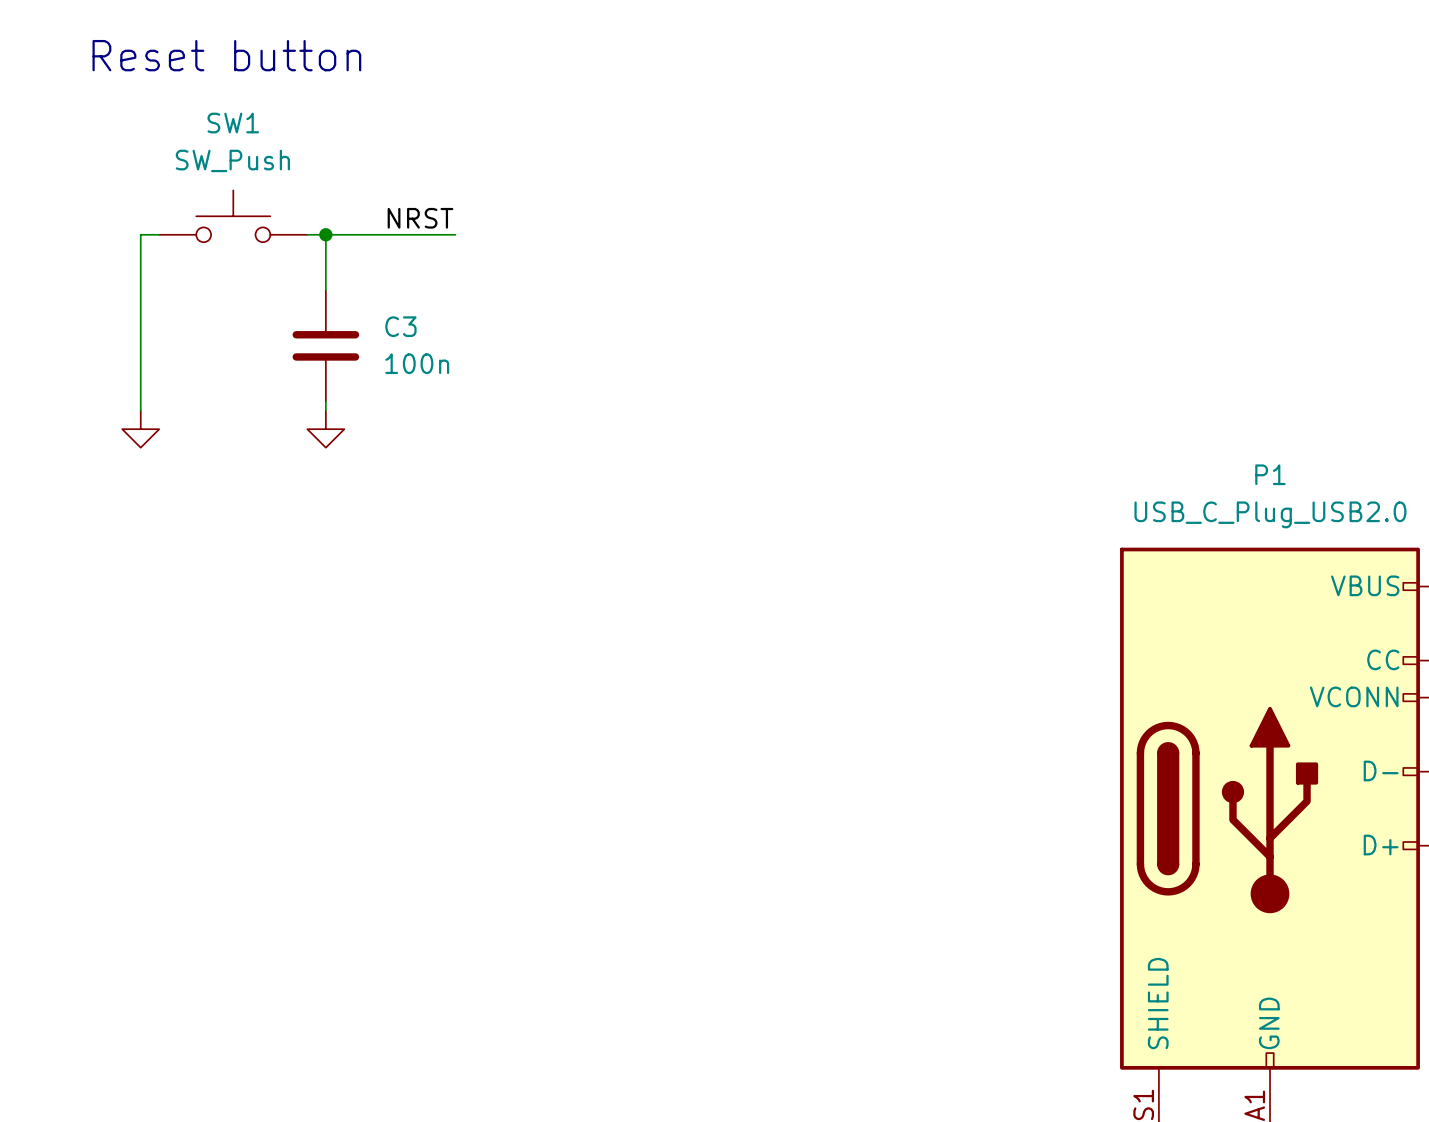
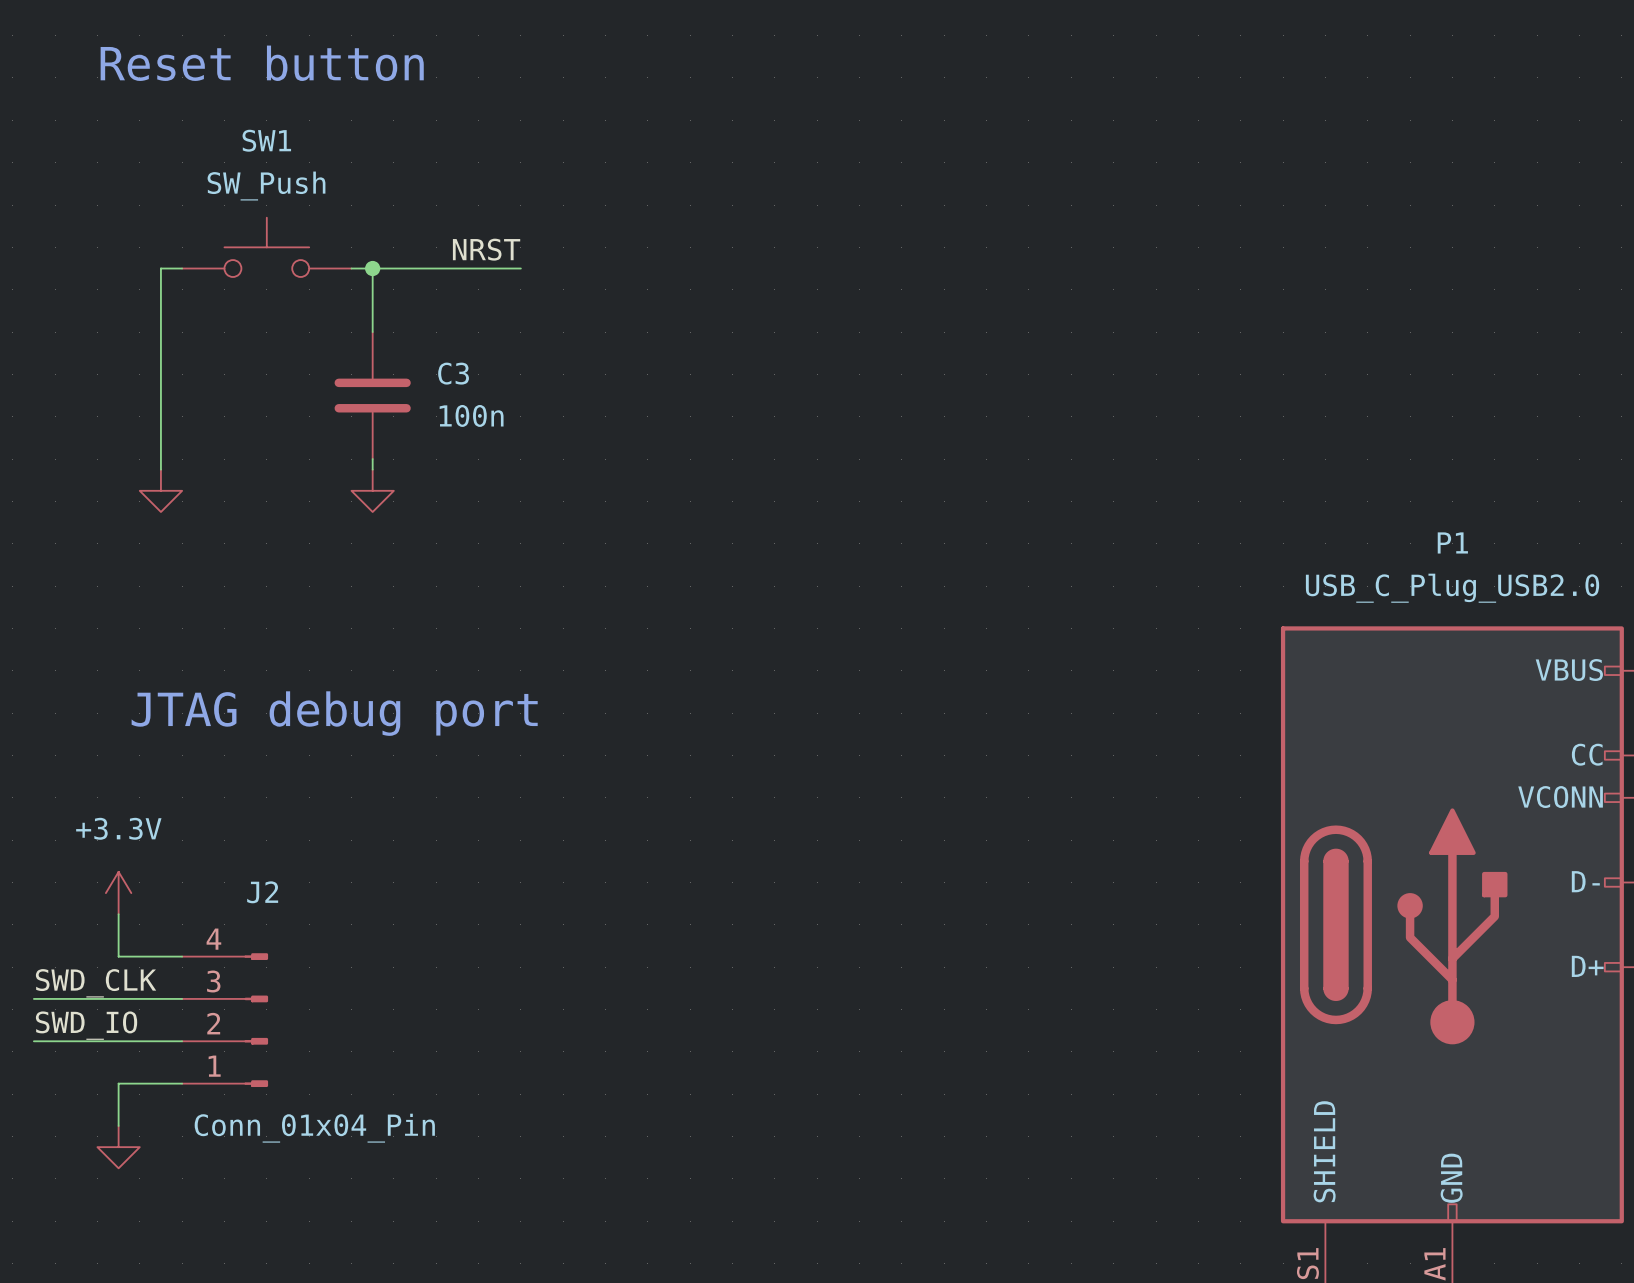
text: none -> JTAG debug port (334, 713)
power symbol: none -> +3.3V (118, 893)
wire: none -> (118, 914) (118, 956) (182, 956)
label: none -> SWD_CLK (96, 983)
wire: none -> (33, 998) (182, 998)
J2: none -> Conn_01x04_Pin (225, 1020)
label: none -> SWD_IO (86, 1025)
wire: none -> (33, 1041) (182, 1041)
wire: none -> (182, 1083) (118, 1083) (118, 1125)
power symbol: none -> (118, 1147)

